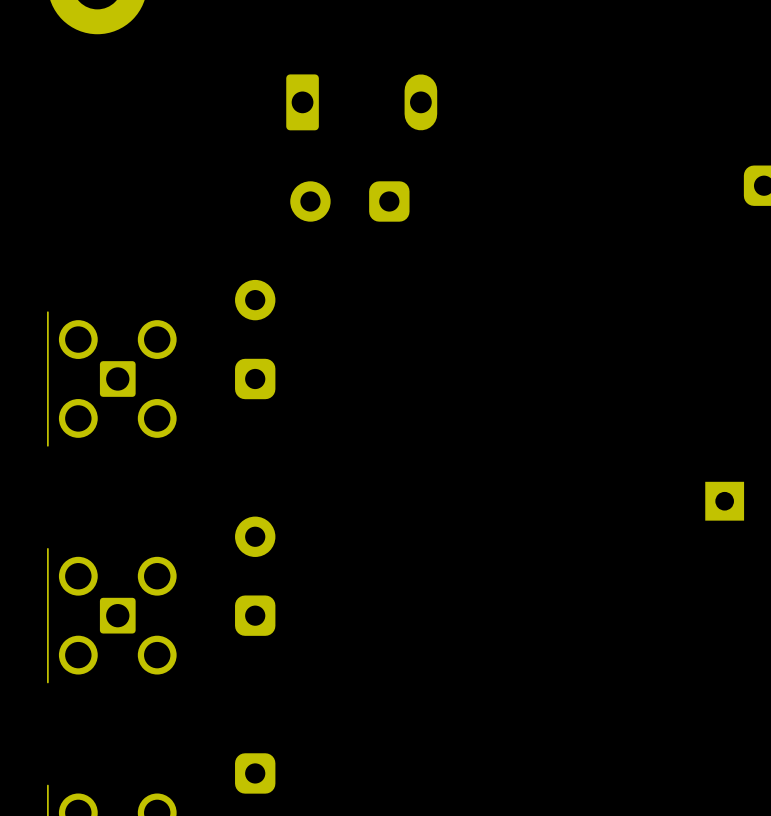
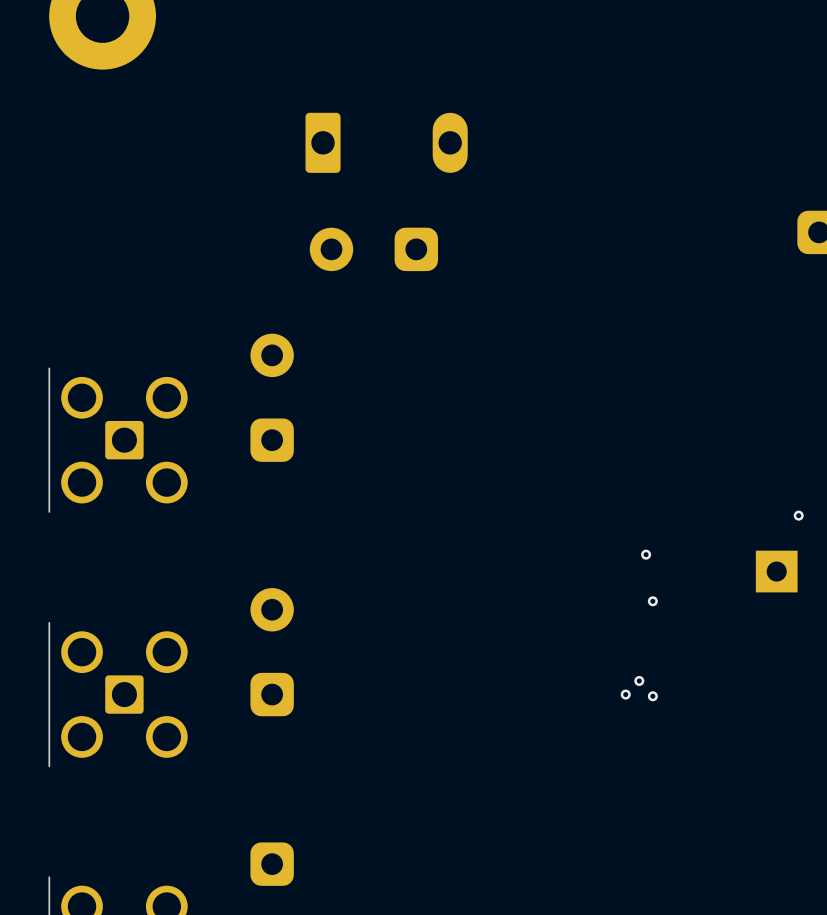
via: none -> (798, 515)
via: none -> (646, 554)
via: none -> (652, 601)
via: none -> (639, 680)
via: none -> (625, 694)
via: none -> (652, 696)

